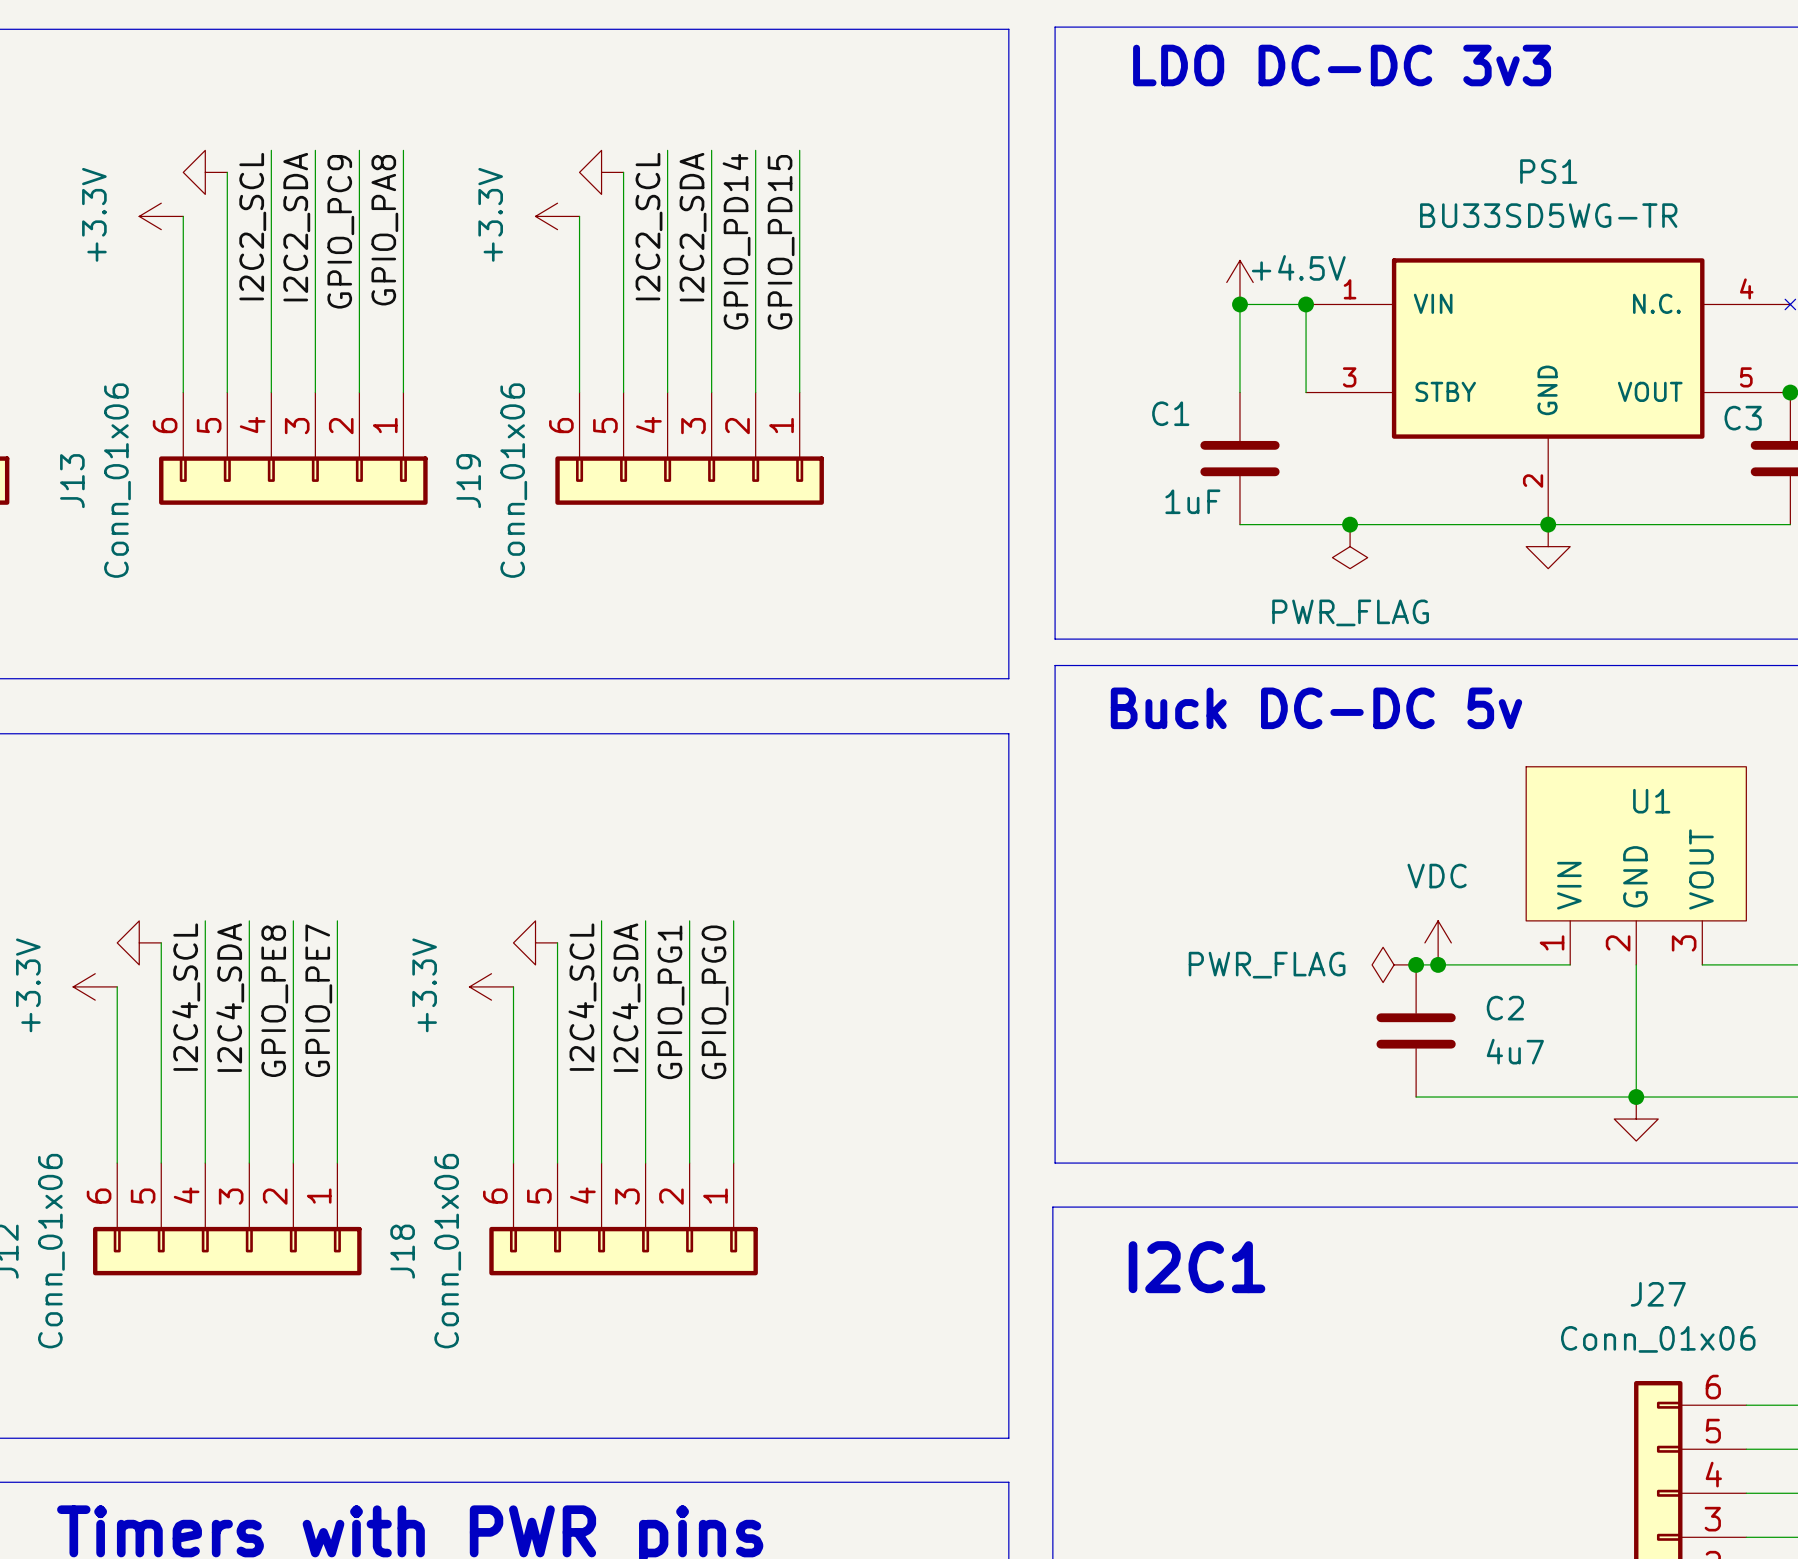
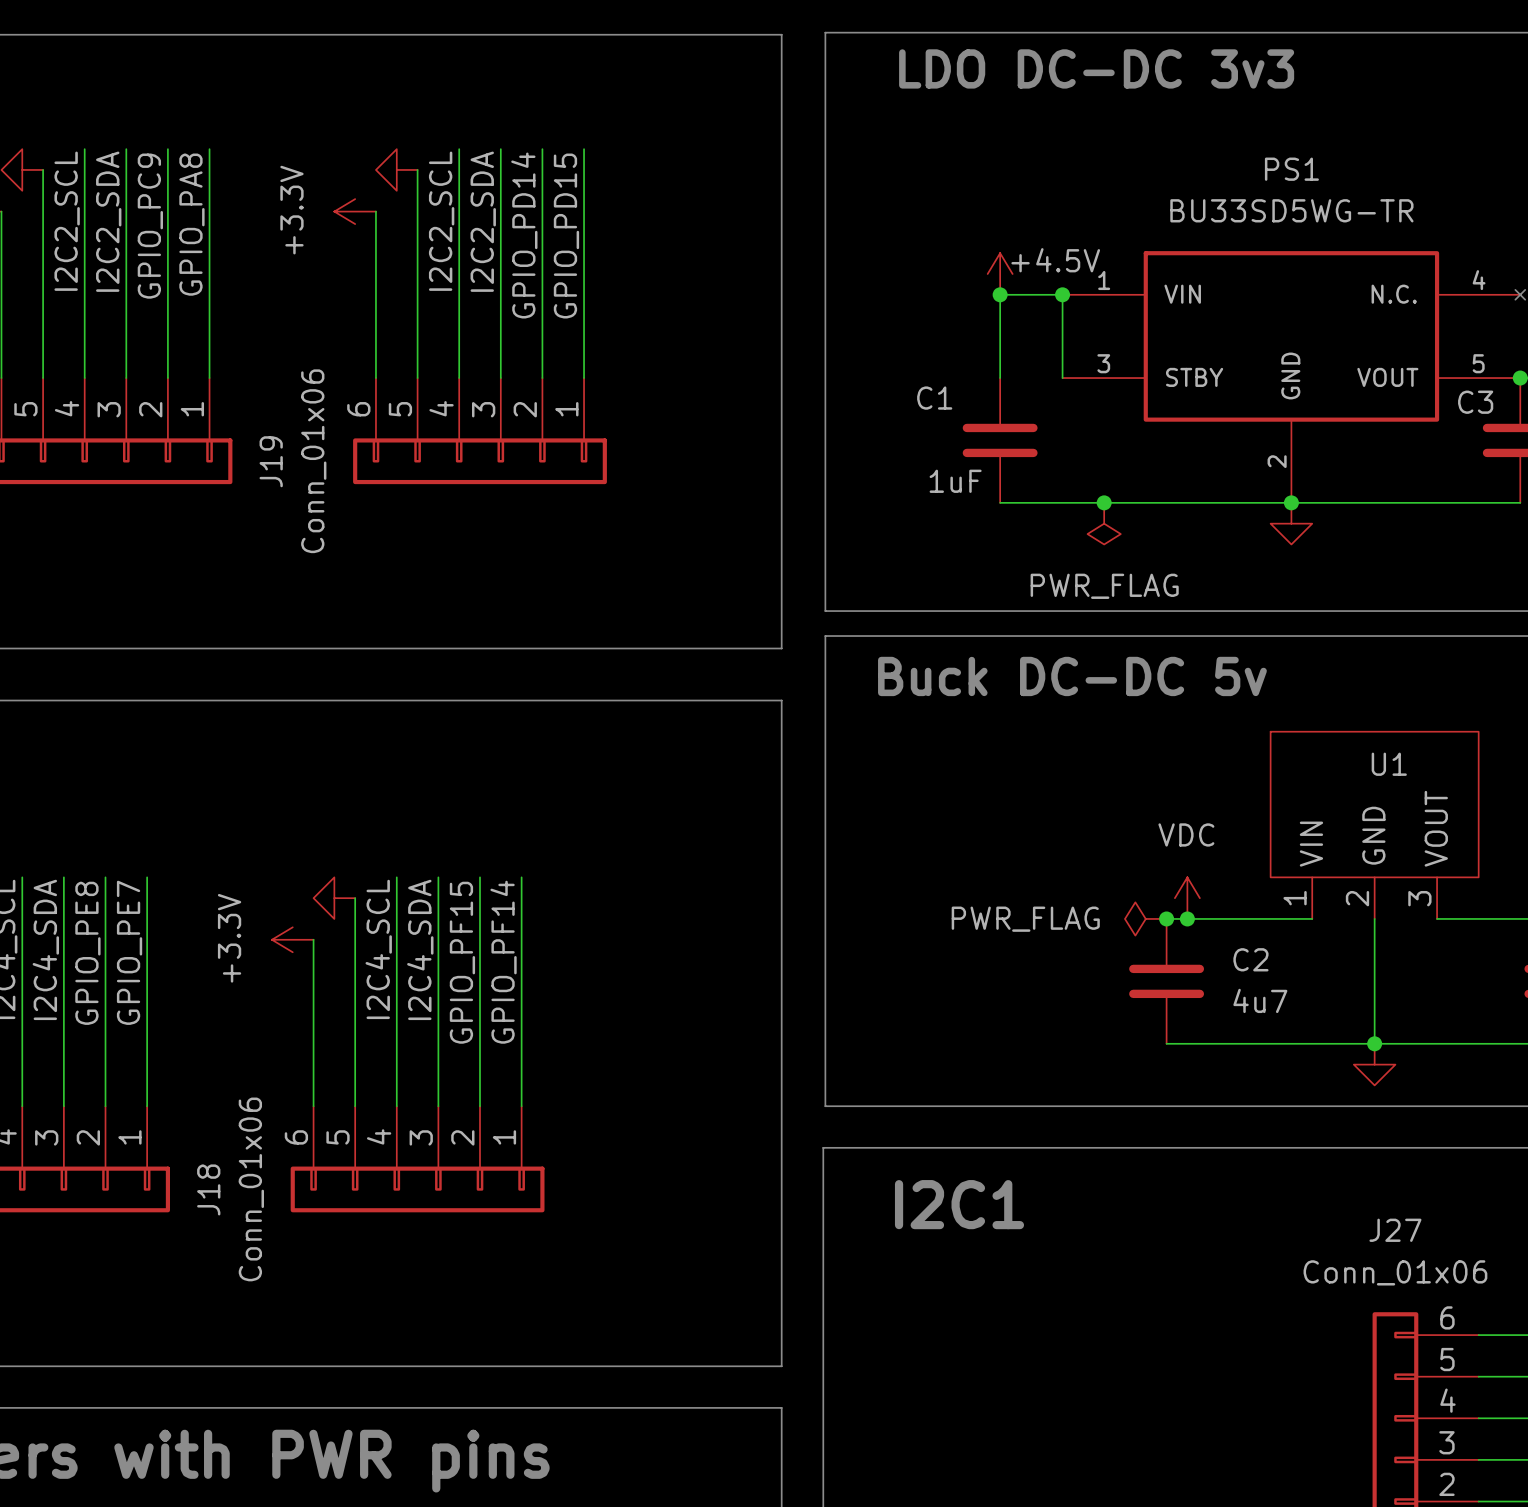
label: GPIO_PG1 (671, 1002) -> GPIO_PF15 (462, 962)
label: GPIO_PG0 (715, 1002) -> GPIO_PF14 (503, 962)

